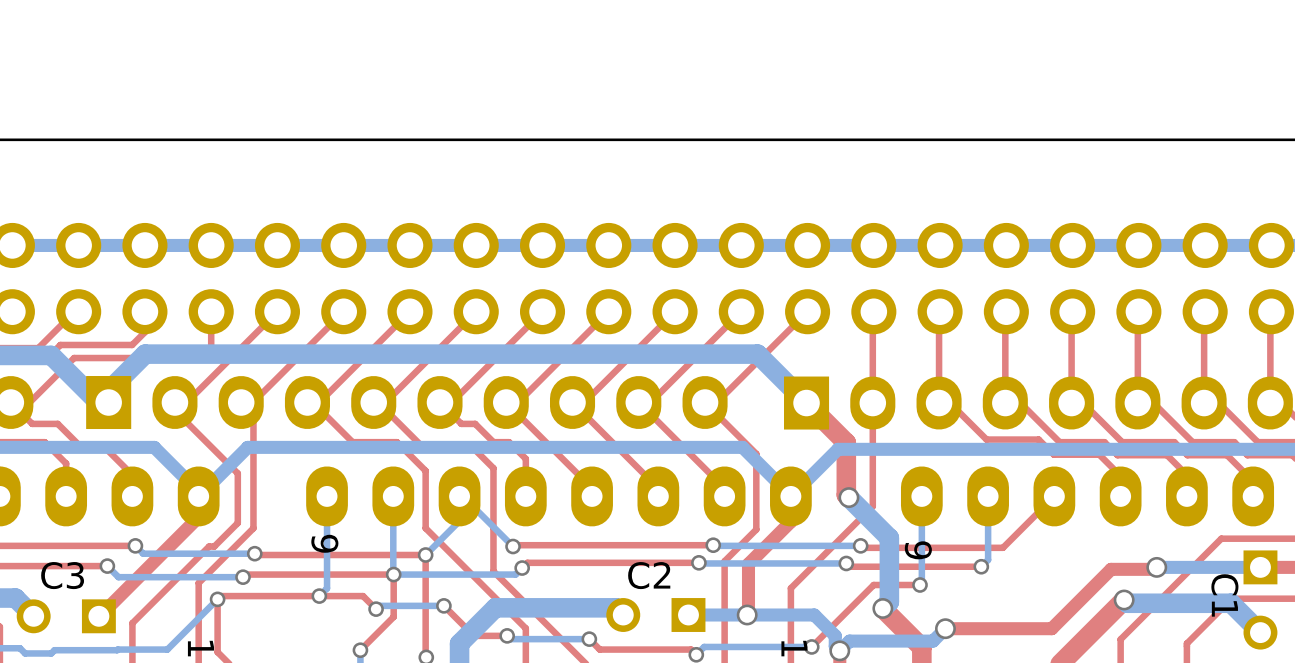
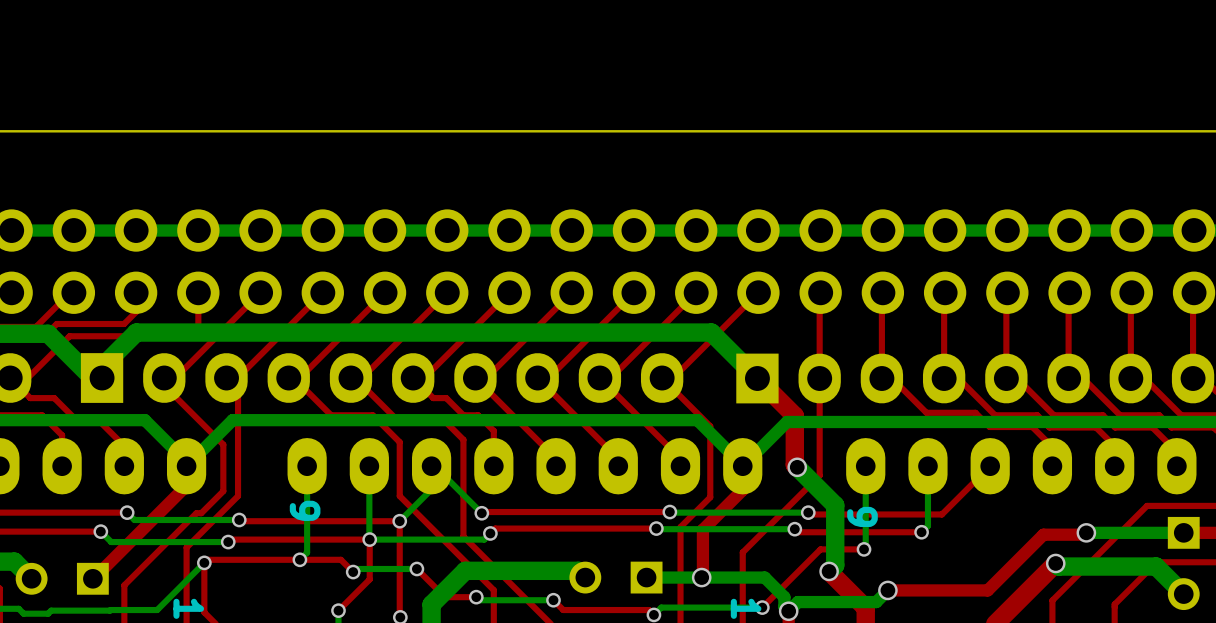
C3 name: C3 (62, 575) -> none
C2 name: C2 (649, 575) -> none
C1 name: C1 (1224, 595) -> none

